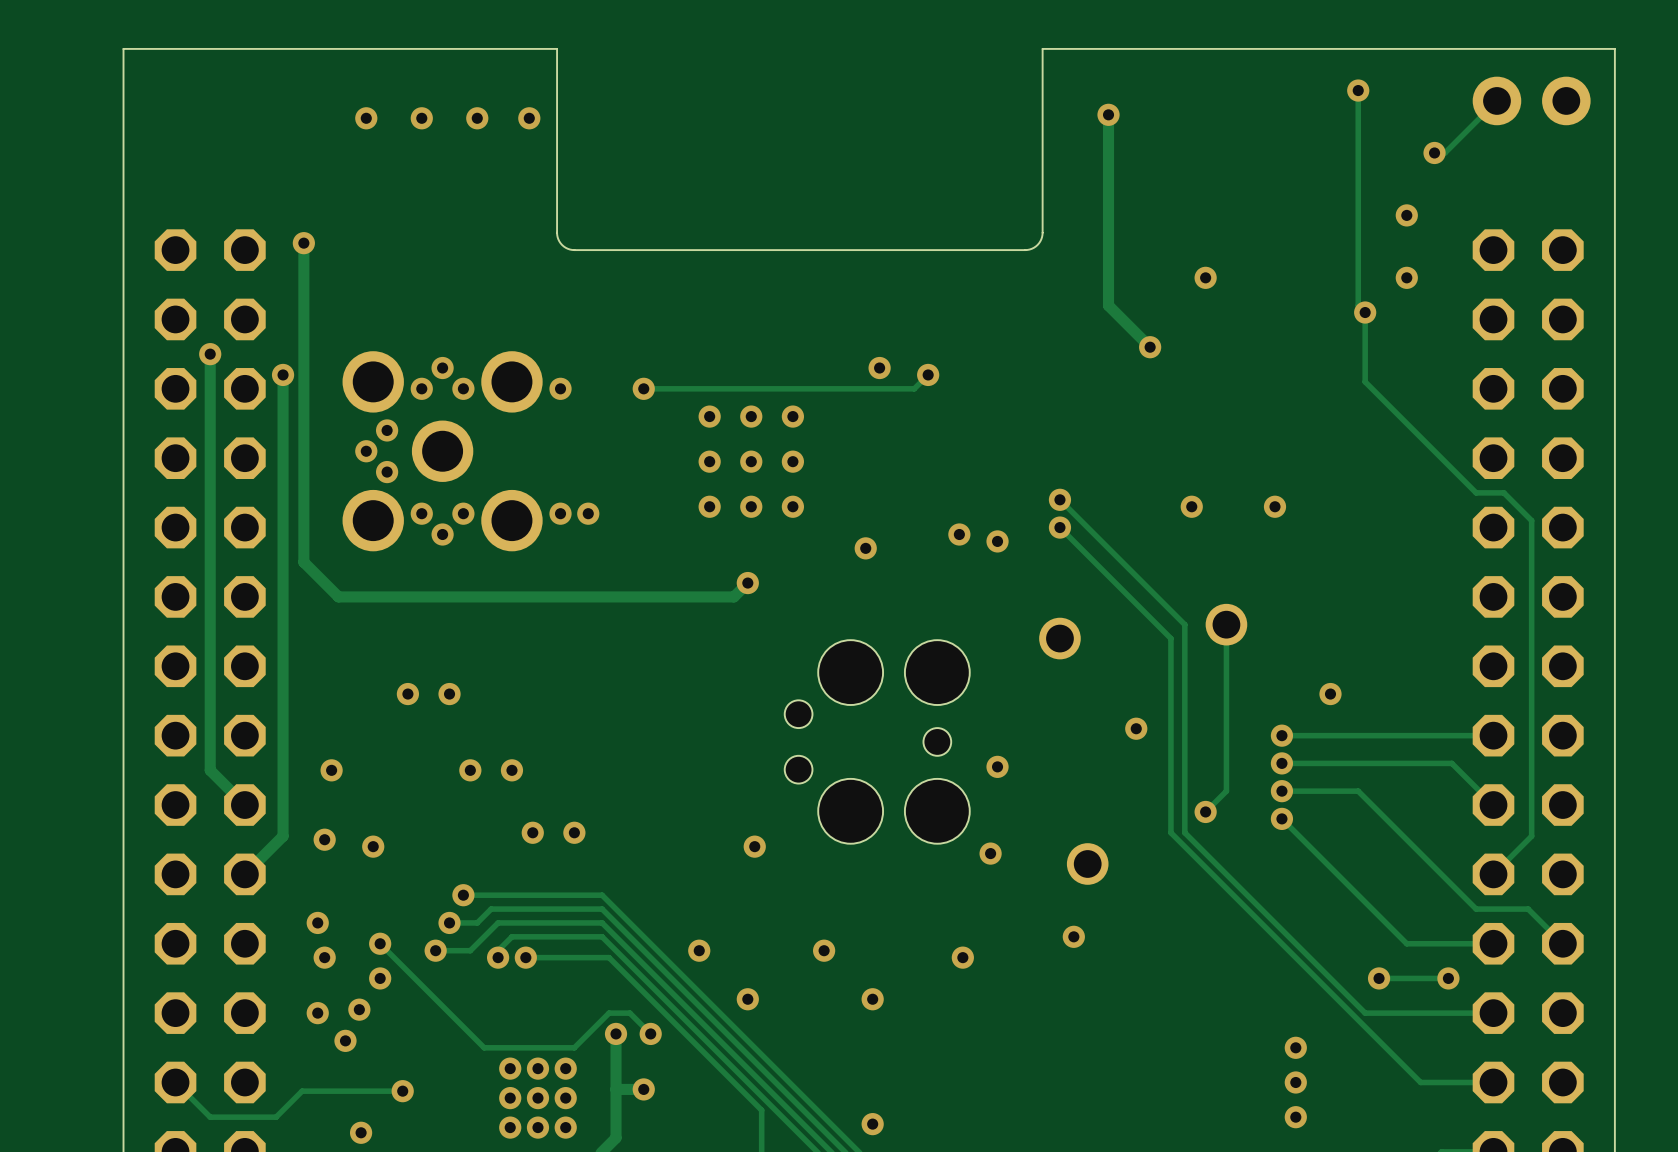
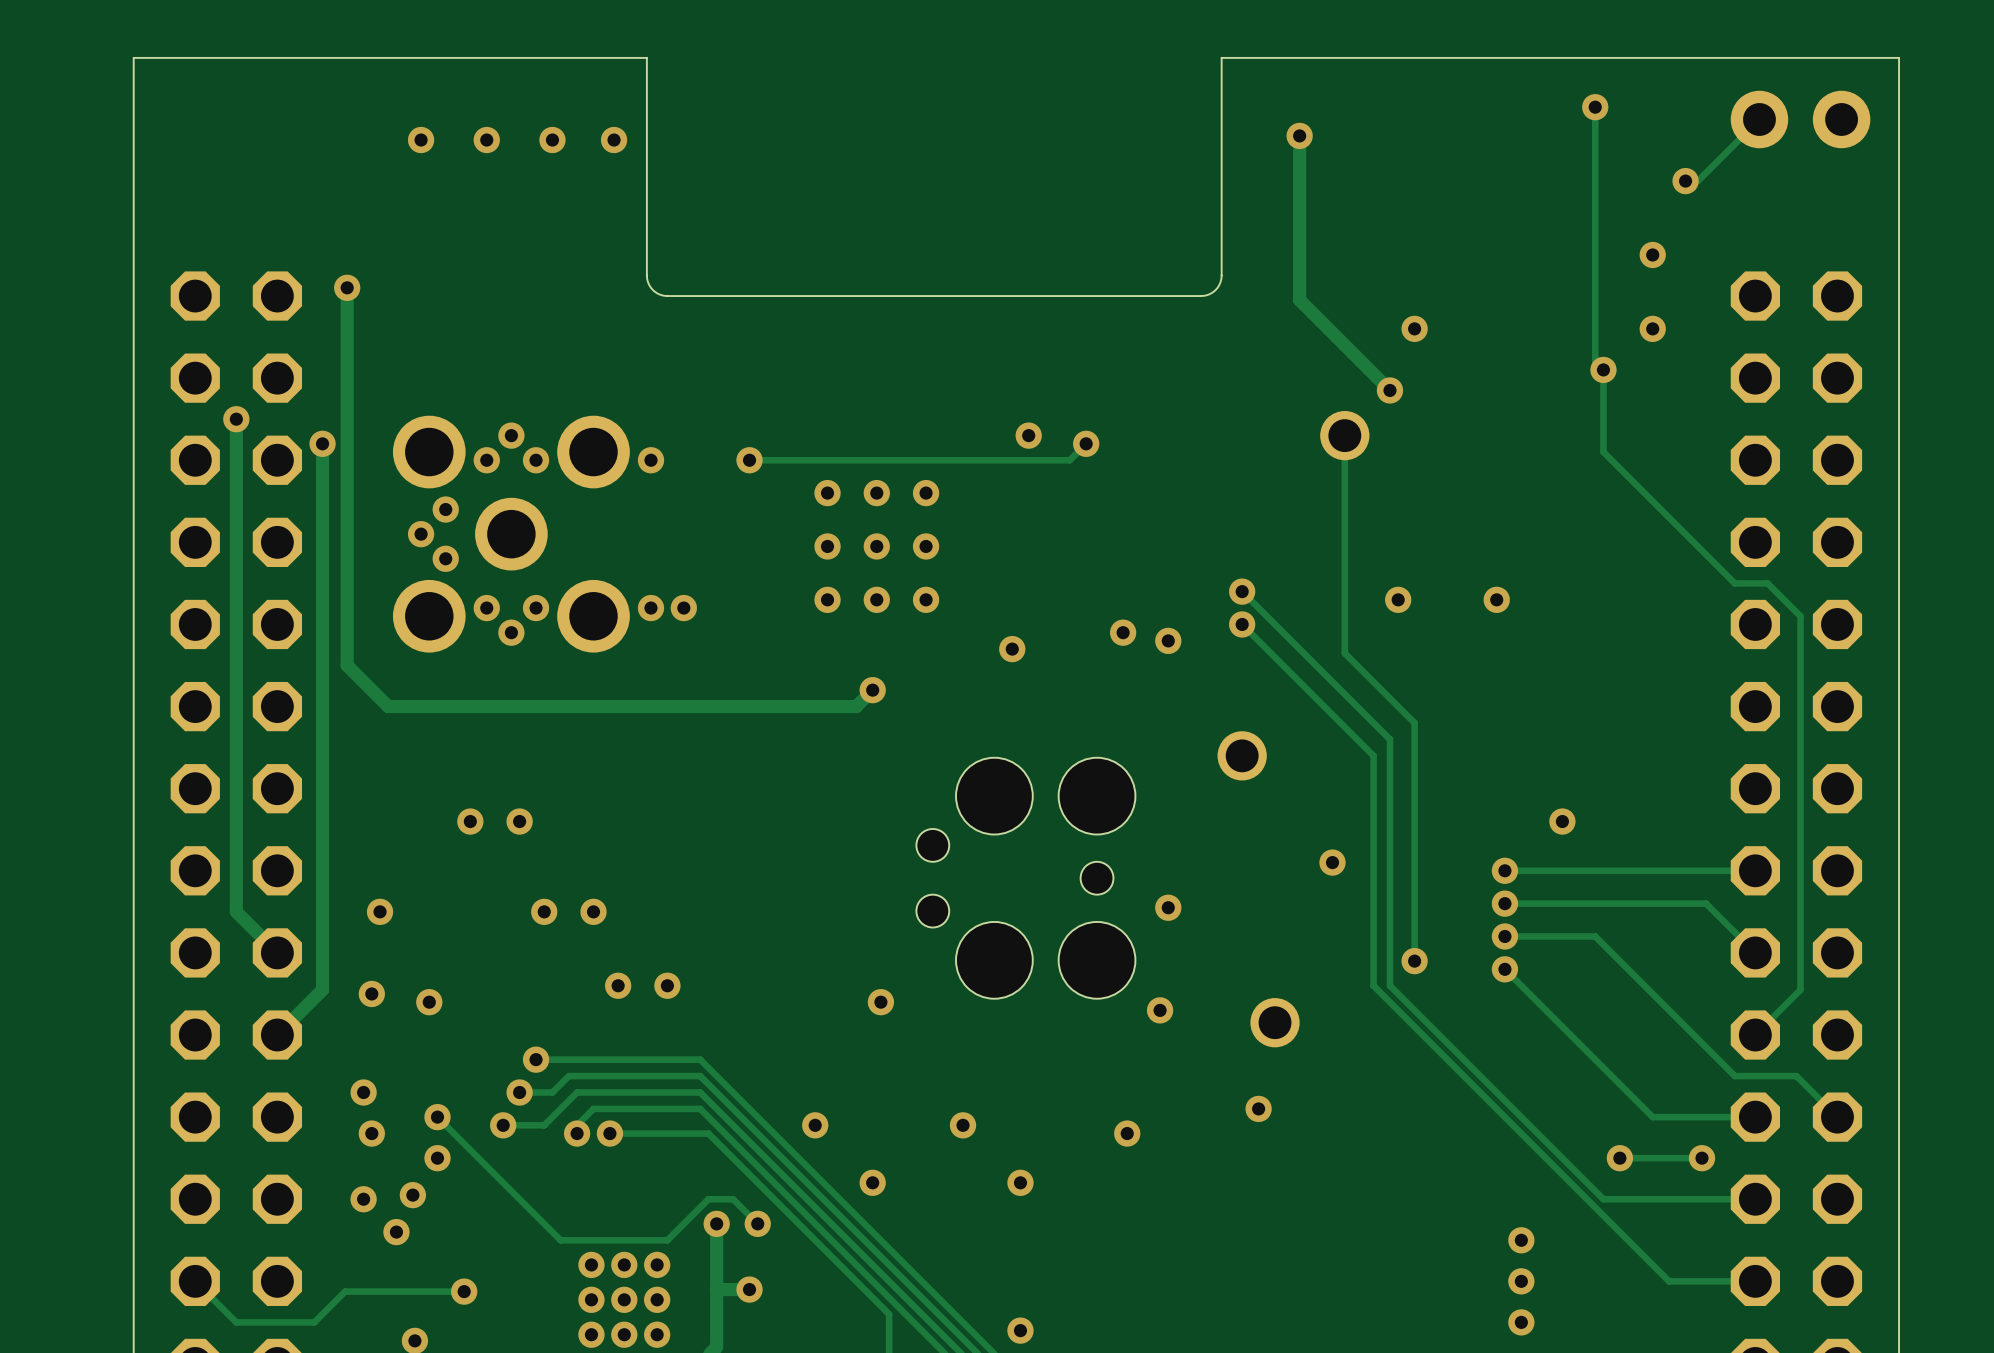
track: (1108, 253) (1108, 305) (1150, 347) -> (1299, 300) (1389, 390)
via position: (1150, 347) -> (1389, 390)
track: (1226, 624) (1226, 791) (1205, 811) -> (1344, 435) (1344, 653) (1414, 723) (1414, 961)
part position: (1226, 624) -> (1344, 435)

